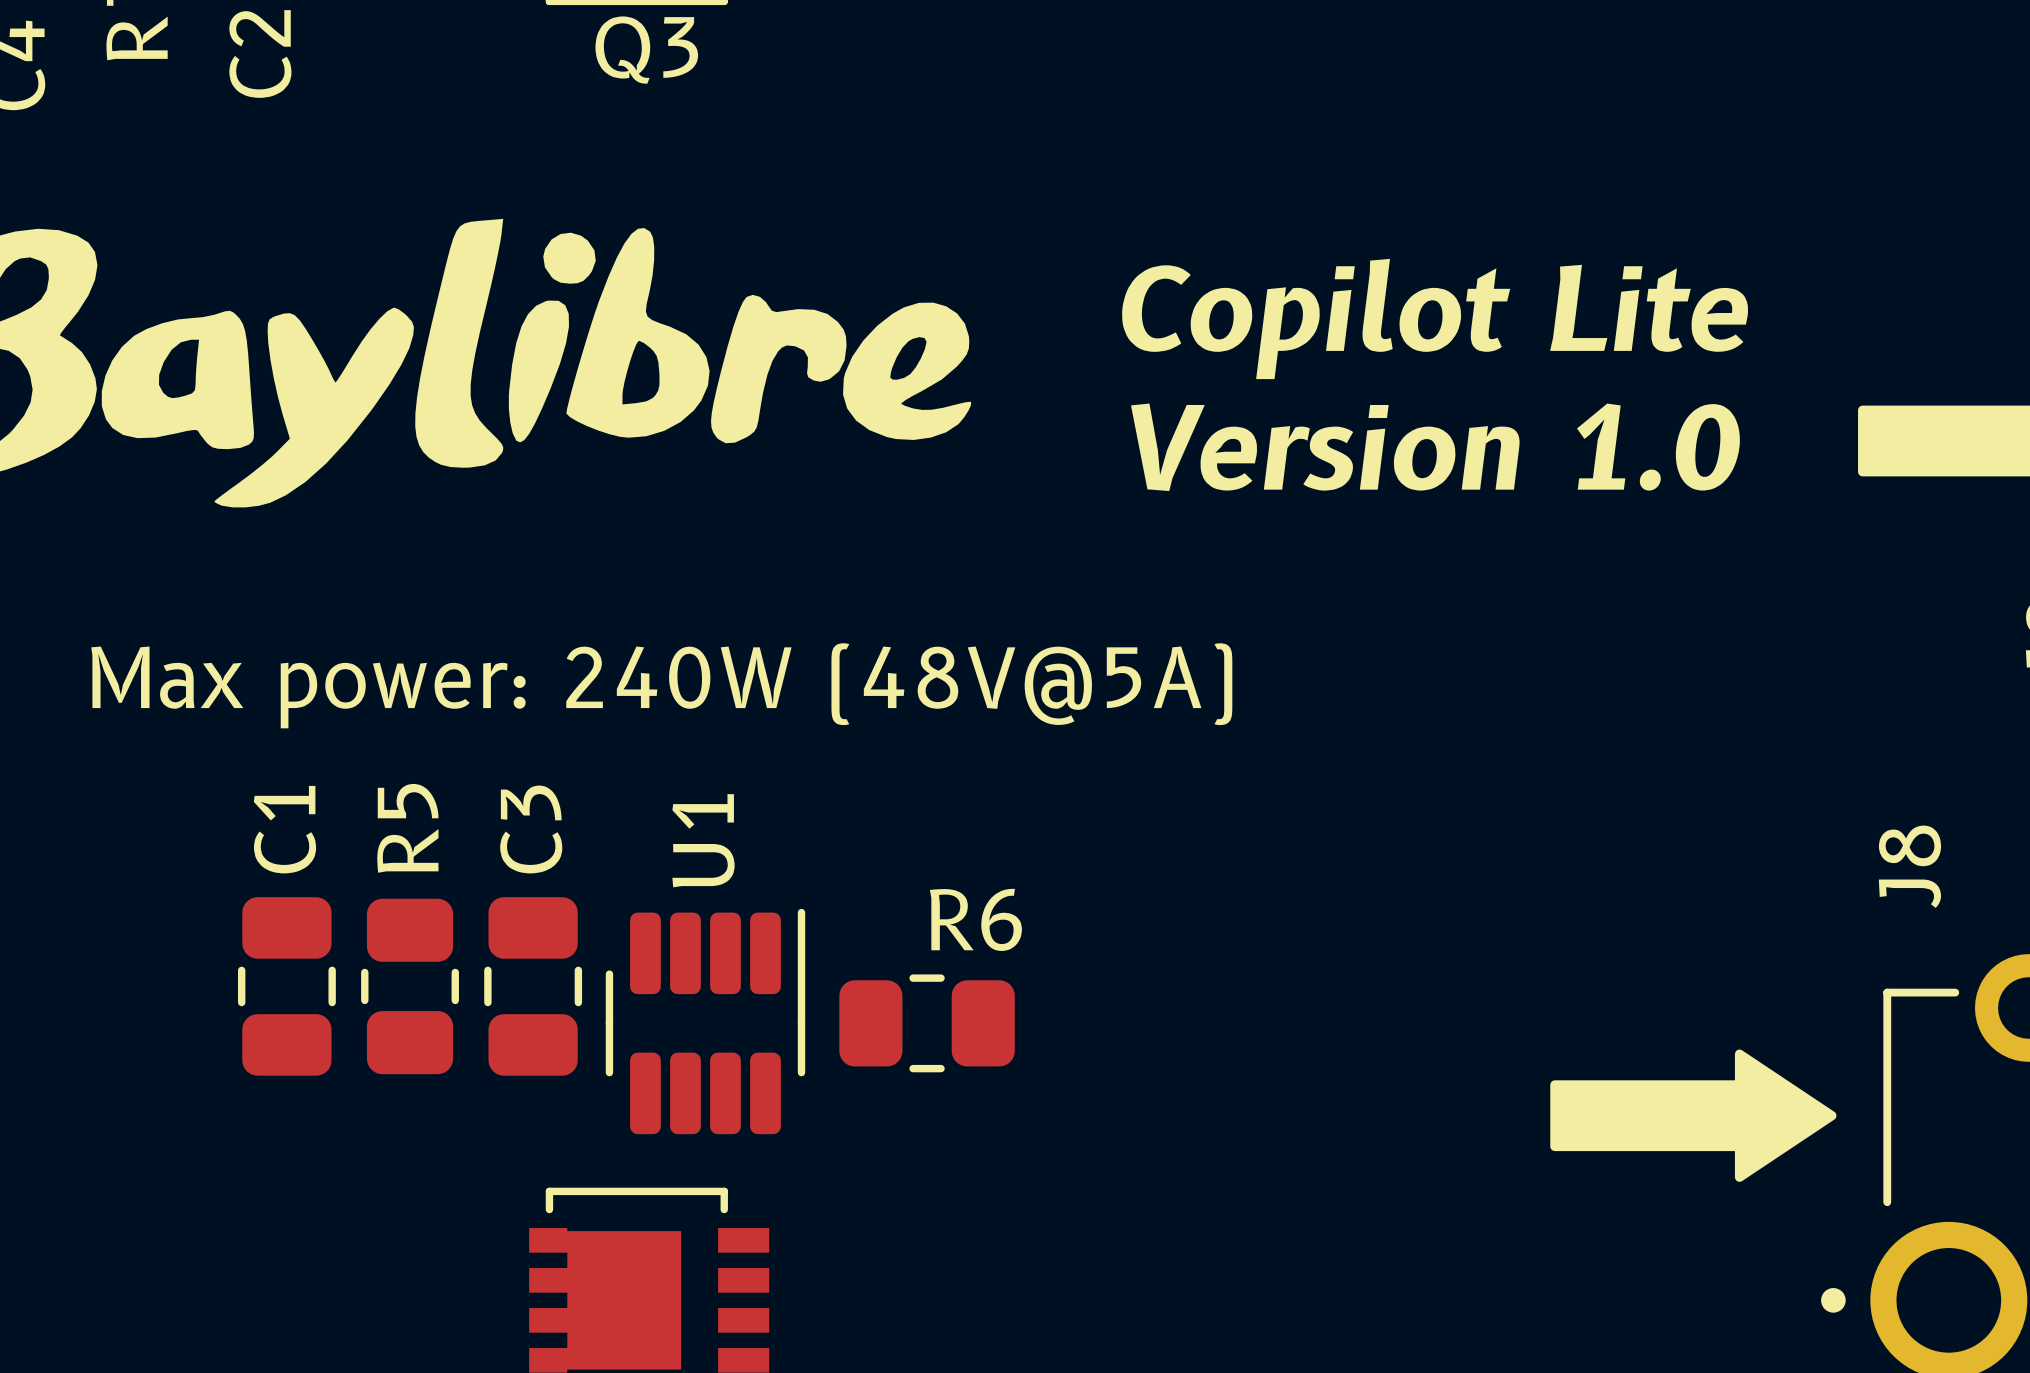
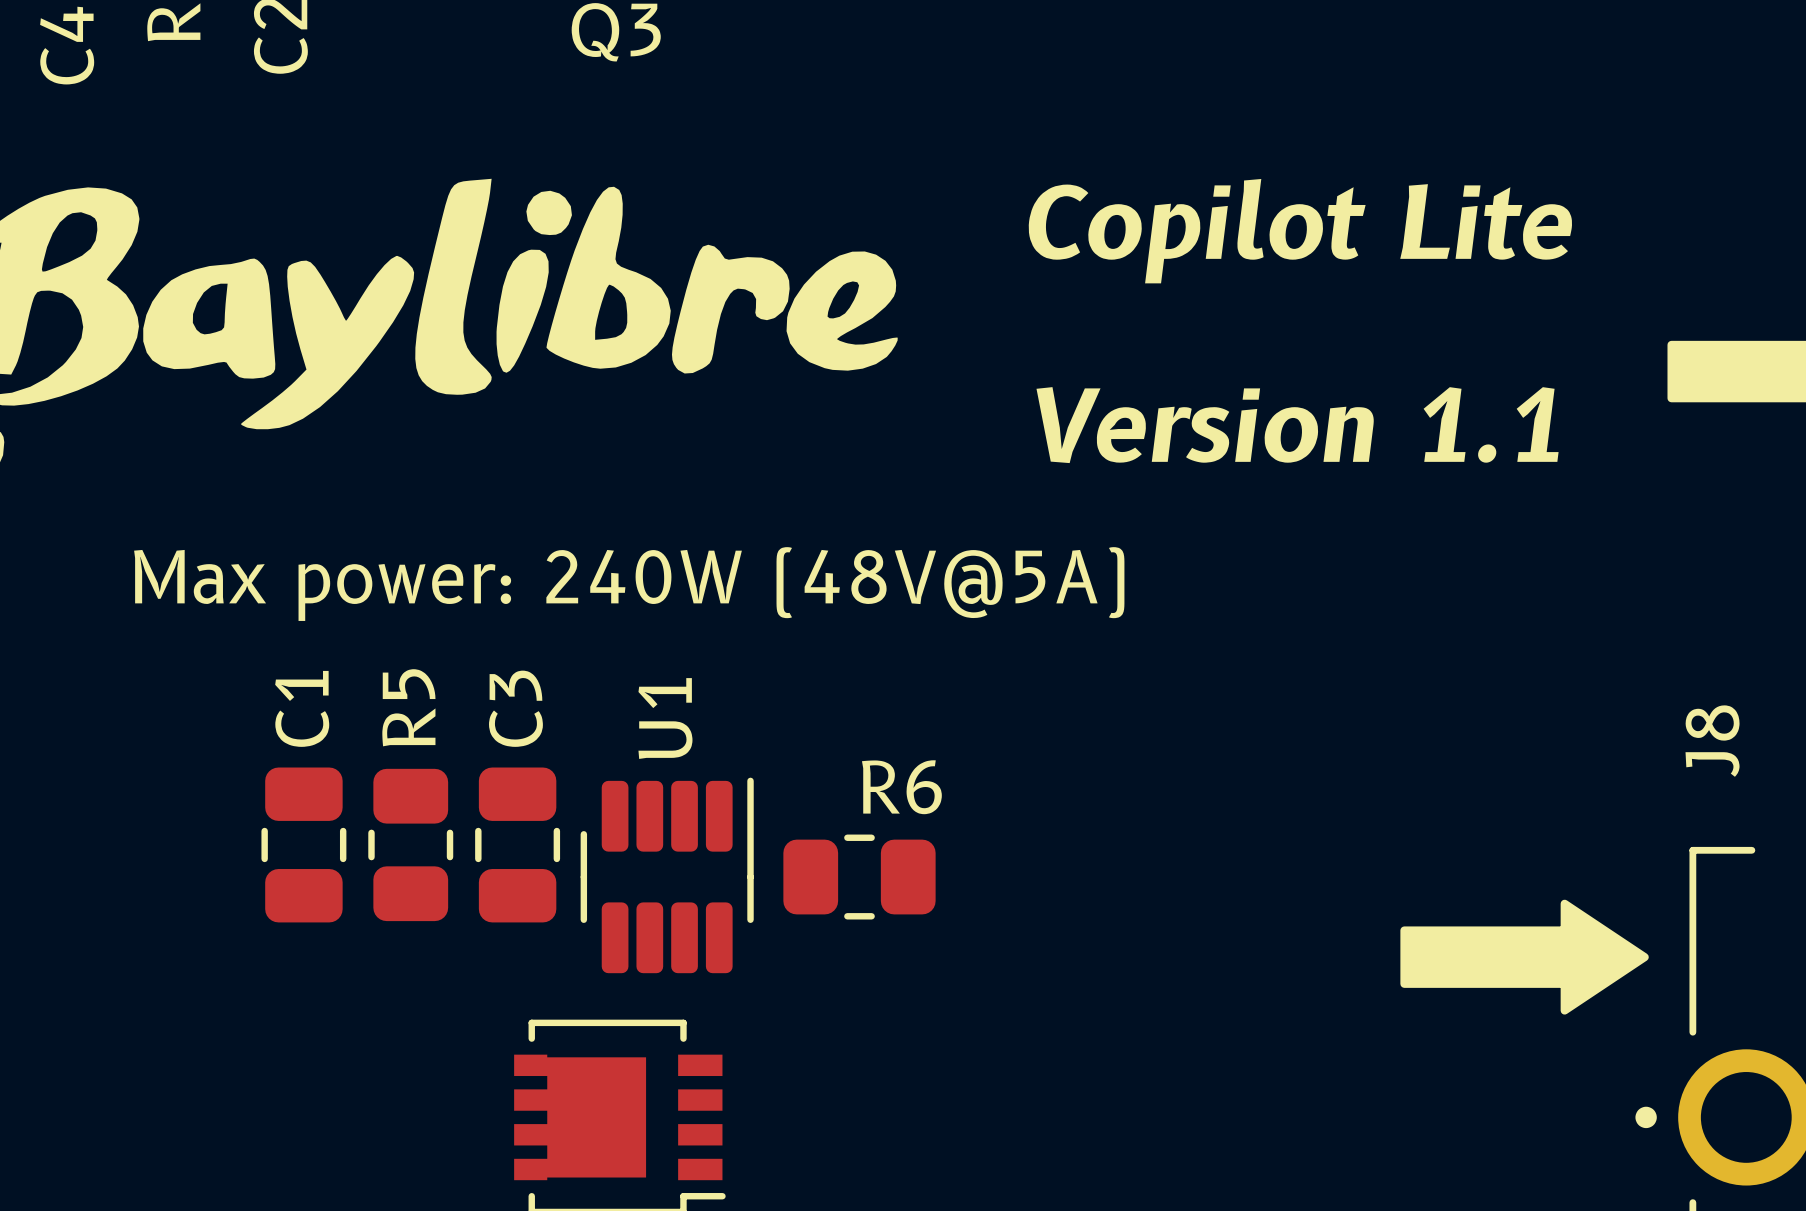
text position: Copilot Lite (1434, 318) -> Copilot Lite (1300, 231)
text: Version 1.0 (1435, 447) -> Version 1.1 (1297, 425)

